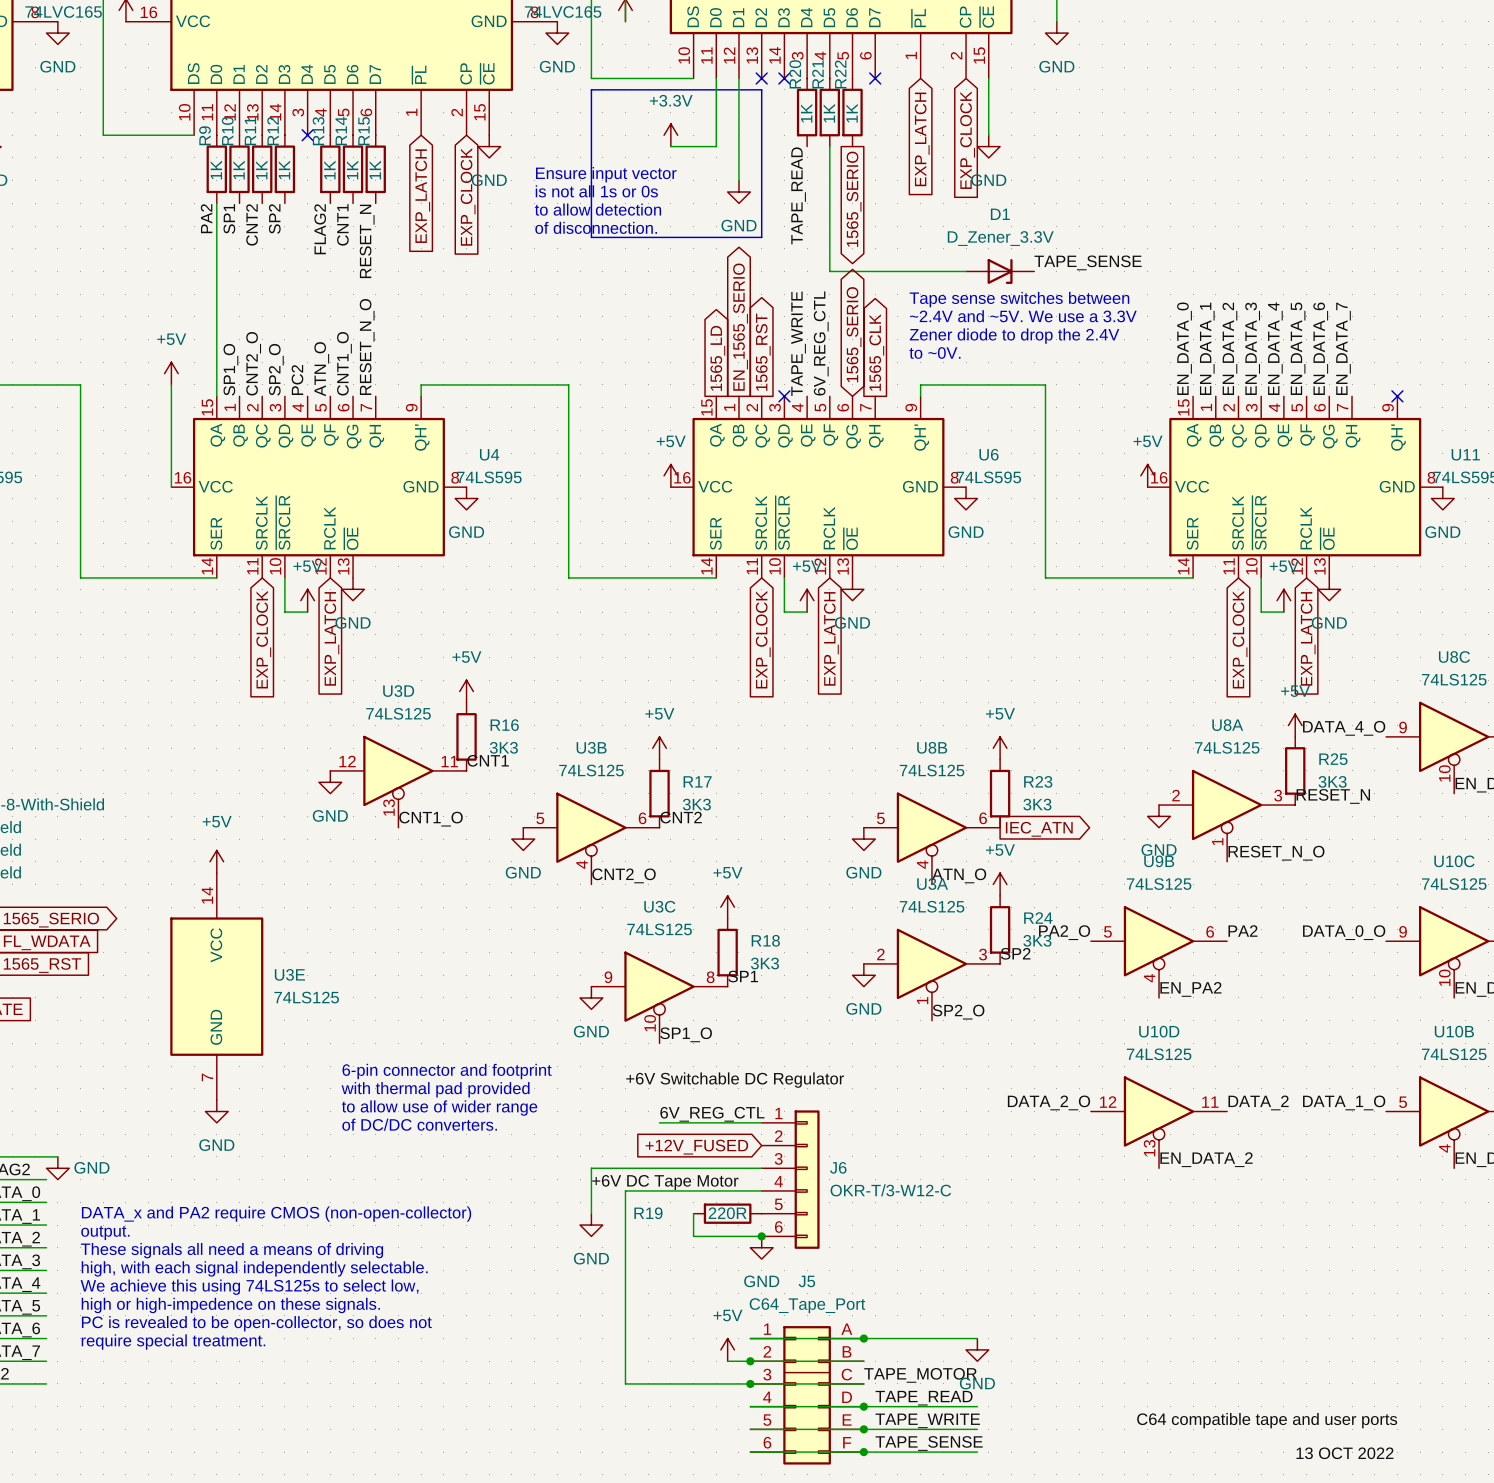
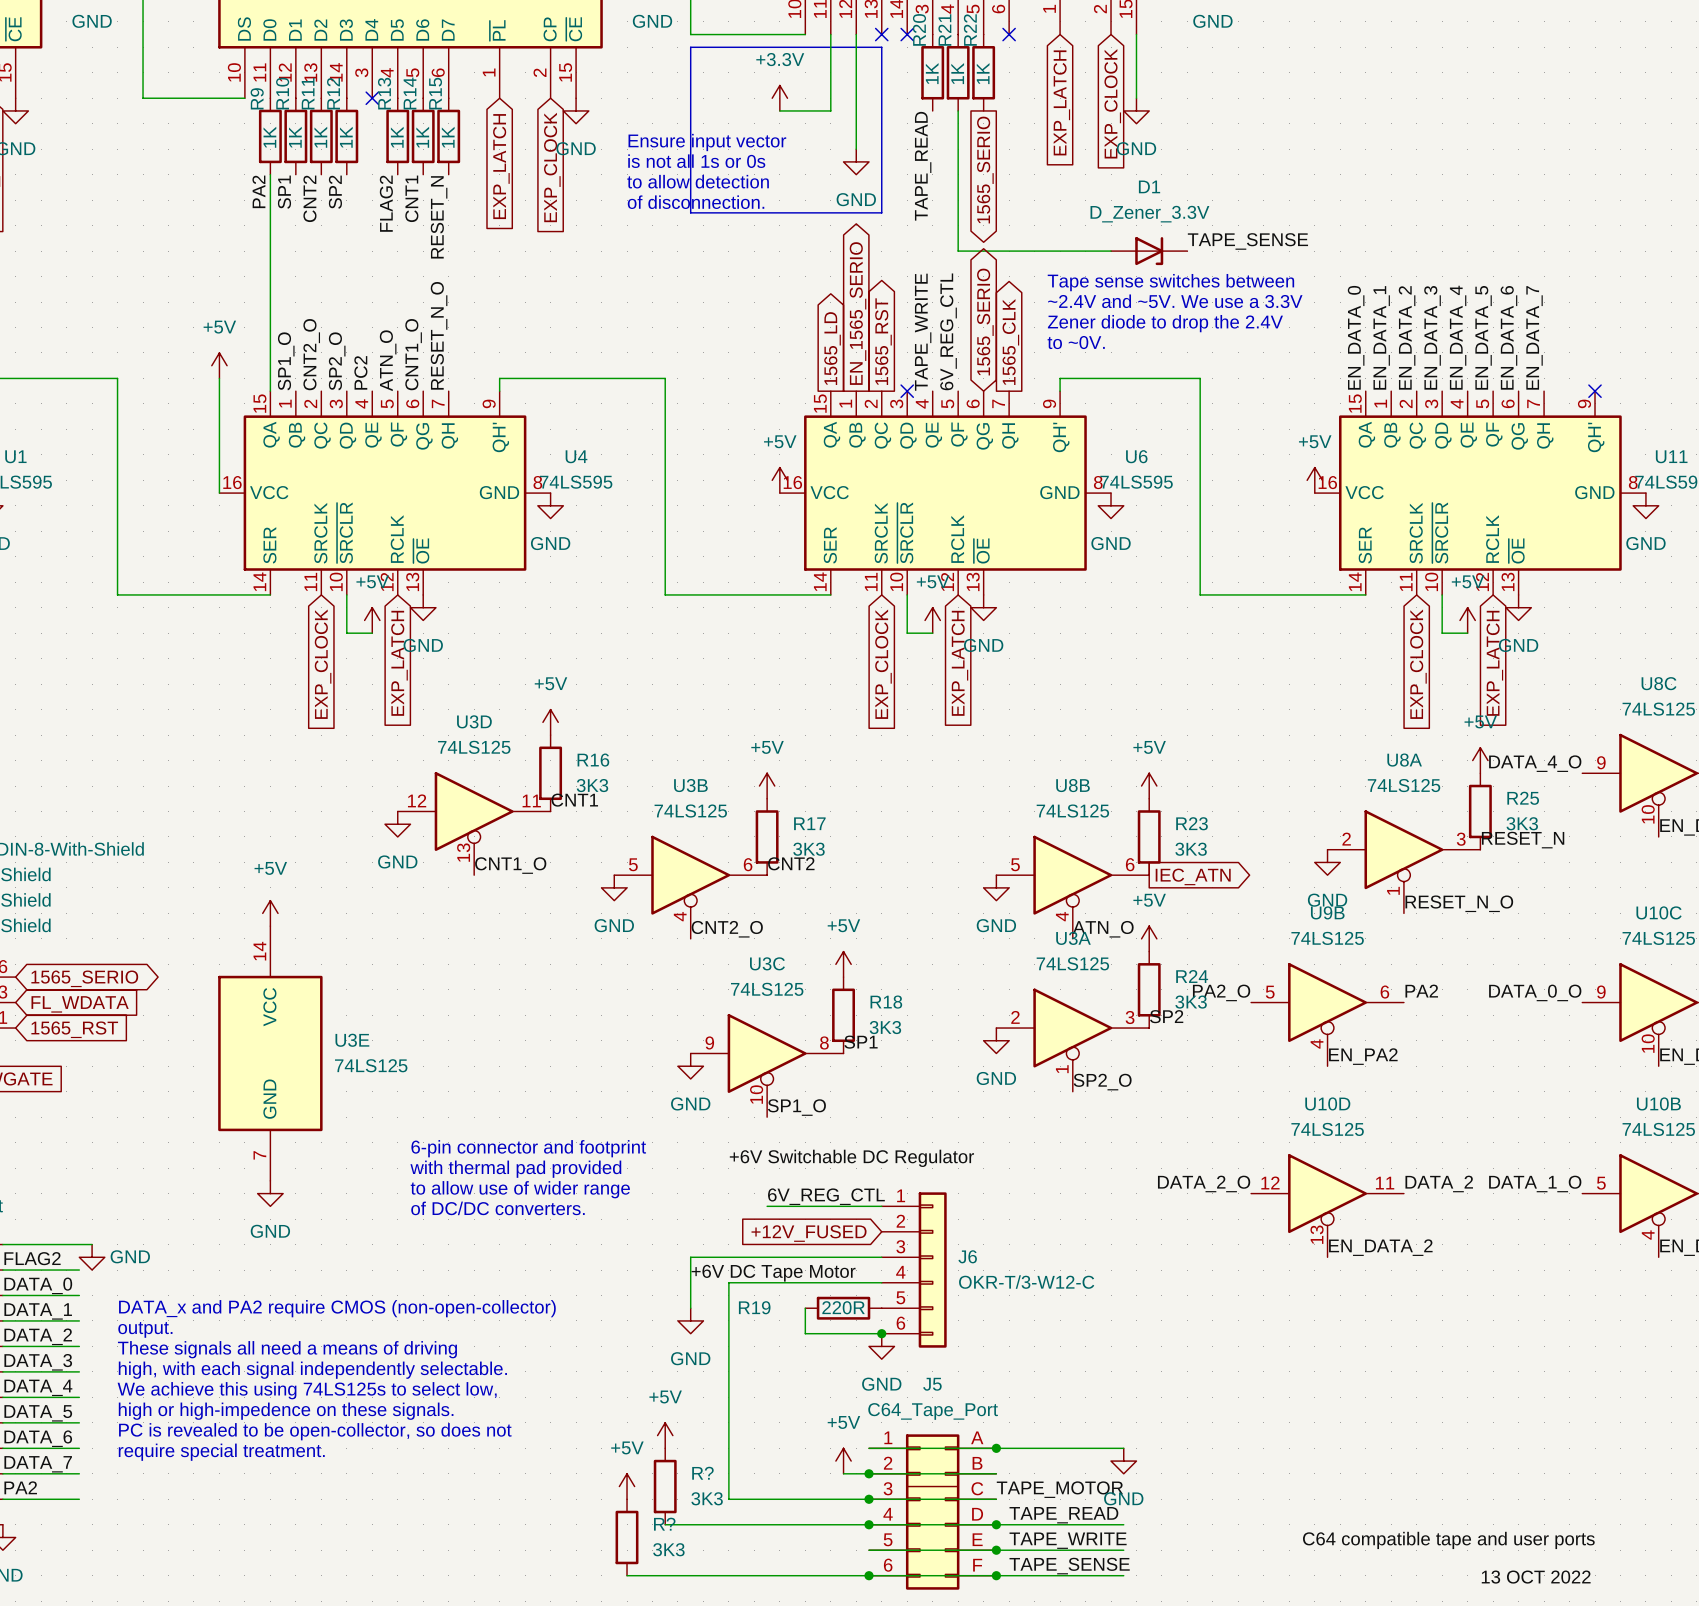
power symbol: none -> +5V (665, 1435)
power symbol: none -> +5V (627, 1486)
R?: none -> 3K3 (665, 1486)
wire: none -> (665, 1524) (869, 1524)
junction: none -> (869, 1524)
R?: none -> 3K3 (627, 1537)
wire: none -> (627, 1575) (869, 1575)
junction: none -> (869, 1575)

